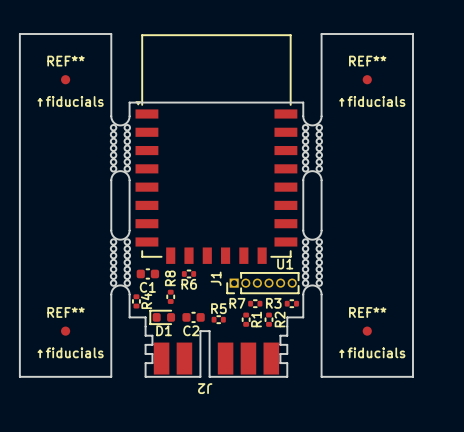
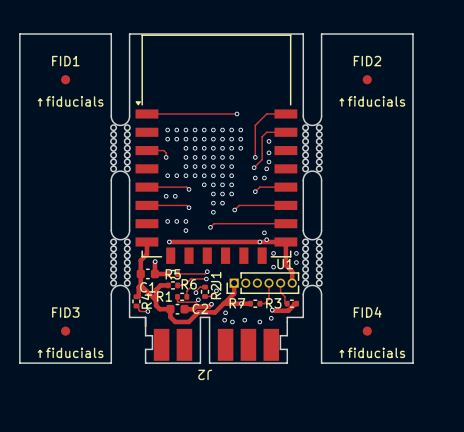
REF** name: REF** (66, 61) -> FID1 (65, 61)
REF** name: REF** (367, 61) -> FID2 (367, 61)
board edge: (129, 102) (303, 102) -> (129, 102) (129, 34) (303, 34) (303, 102)
track: none -> (146, 113) (237, 113)
via: none -> (237, 113)
track: none -> (285, 113) (266, 113) (255, 125) (255, 157)
via: none -> (167, 130)
via: none -> (176, 130)
via: none -> (185, 130)
via: none -> (195, 130)
via: none -> (204, 130)
via: none -> (213, 130)
via: none -> (222, 130)
via: none -> (231, 130)
via: none -> (240, 130)
track: none -> (285, 132) (266, 132) (262, 136) (262, 159) (254, 167)
via: none -> (167, 139)
via: none -> (176, 139)
via: none -> (185, 139)
via: none -> (195, 139)
via: none -> (204, 139)
via: none -> (213, 139)
via: none -> (222, 139)
via: none -> (231, 139)
via: none -> (240, 139)
via: none -> (269, 141)
via: none -> (185, 148)
via: none -> (195, 148)
via: none -> (204, 148)
via: none -> (213, 148)
via: none -> (222, 148)
via: none -> (231, 148)
via: none -> (240, 148)
track: none -> (146, 150) (163, 150) (166, 157)
via: none -> (269, 152)
via: none -> (166, 157)
via: none -> (185, 157)
via: none -> (195, 157)
via: none -> (204, 157)
via: none -> (213, 157)
via: none -> (222, 157)
via: none -> (231, 157)
via: none -> (255, 157)
via: none -> (269, 161)
via: none -> (185, 166)
via: none -> (195, 166)
via: none -> (204, 166)
via: none -> (213, 166)
via: none -> (222, 166)
via: none -> (231, 166)
via: none -> (254, 167)
via: none -> (266, 168)
via: none -> (167, 175)
via: none -> (176, 175)
via: none -> (185, 175)
via: none -> (195, 175)
via: none -> (204, 175)
via: none -> (213, 175)
via: none -> (222, 175)
via: none -> (231, 175)
via: none -> (255, 177)
via: none -> (264, 177)
via: none -> (204, 184)
via: none -> (213, 184)
via: none -> (222, 184)
via: none -> (231, 184)
track: none -> (146, 187) (186, 187) (189, 189)
track: none -> (285, 187) (259, 187) (255, 191)
via: none -> (189, 189)
via: none -> (255, 191)
via: none -> (213, 194)
via: none -> (222, 194)
via: none -> (231, 194)
via: none -> (166, 196)
via: none -> (175, 196)
via: none -> (213, 203)
via: none -> (222, 203)
track: none -> (146, 205) (186, 205) (189, 207)
track: none -> (285, 205) (239, 205) (234, 209)
via: none -> (189, 207)
via: none -> (234, 209)
via: none -> (213, 212)
via: none -> (167, 221)
via: none -> (176, 221)
via: none -> (185, 221)
track: none -> (285, 223) (214, 223) (210, 227)
via: none -> (210, 227)
via: none -> (185, 230)
via: none -> (264, 232)
via: none -> (266, 239)
track: none -> (146, 241) (146, 254) (140, 260) (140, 285)
track: none -> (169, 241) (285, 241) (285, 265) (292, 271) (292, 283)
via: none -> (169, 241)
via: none -> (259, 241)
via: none -> (273, 253)
via: none -> (296, 253)
track: none -> (155, 261) (154, 273) (168, 273)
via: none -> (155, 261)
via: none -> (296, 262)
via: none -> (273, 267)
track: none -> (207, 271) (205, 273) (177, 273)
via: none -> (207, 271)
R6 position: (189, 273) -> (173, 273)
track: none -> (206, 279) (190, 279) (184, 285) (177, 285)
via: none -> (206, 279)
track: none -> (234, 283) (234, 293) (223, 303)
track: none -> (269, 283) (269, 299) (264, 303) (257, 303)
track: none -> (280, 283) (280, 292) (284, 296) (284, 303)
track: none -> (140, 285) (156, 300)
track: none -> (140, 285) (138, 287) (138, 296)
track: none -> (168, 285) (160, 285) (156, 289) (156, 305) (159, 309) (170, 309) (170, 317) (175, 321) (188, 321) (198, 312) (215, 312) (223, 303) (248, 303)
track: none -> (190, 287) (186, 291) (186, 296)
track: none -> (205, 287) (200, 287) (195, 292)
track: none -> (216, 290) (210, 296) (205, 296)
via: none -> (216, 290)
via: none -> (195, 292)
R8: (170, 296) -> none
track: none -> (177, 296) (178, 302) (196, 302) (198, 299)
via: none -> (198, 299)
via: none -> (241, 303)
track: none -> (294, 303) (288, 310) (272, 310)
track: none -> (211, 304) (209, 306) (184, 309)
via: none -> (211, 304)
track: none -> (138, 306) (140, 311) (147, 311)
via: none -> (272, 310)
via: none -> (147, 311)
REF** name: REF** (66, 312) -> FID3 (65, 312)
via: none -> (225, 312)
REF** name: REF** (367, 312) -> FID4 (367, 312)
D1: (162, 317) -> none
C2 position: (193, 317) -> (177, 309)
board edge: (287, 317) (287, 326) -> none
via: none -> (271, 318)
R5 position: (218, 319) -> (173, 285)
R1 rotation: 0° (246, 319) -> 90° clockwise (182, 296)
R1 position: (246, 319) -> (182, 296)
R1 name position: R1 (256, 319) -> R1 (164, 296)
R2 position: (269, 319) -> (205, 291)
via: none -> (224, 320)
via: none -> (244, 320)
via: none -> (232, 321)
via: none -> (259, 321)
J2 footprint: [145, 326, 288, 378] -> [145, 317, 288, 364]
C2 name position: C2 (191, 330) -> C2 (200, 308)
board edge: (19, 363) (19, 376) (111, 376) (111, 363) -> (19, 363) (111, 363)
board edge: (321, 363) (321, 376) (412, 376) (412, 363) -> (321, 363) (412, 363)

